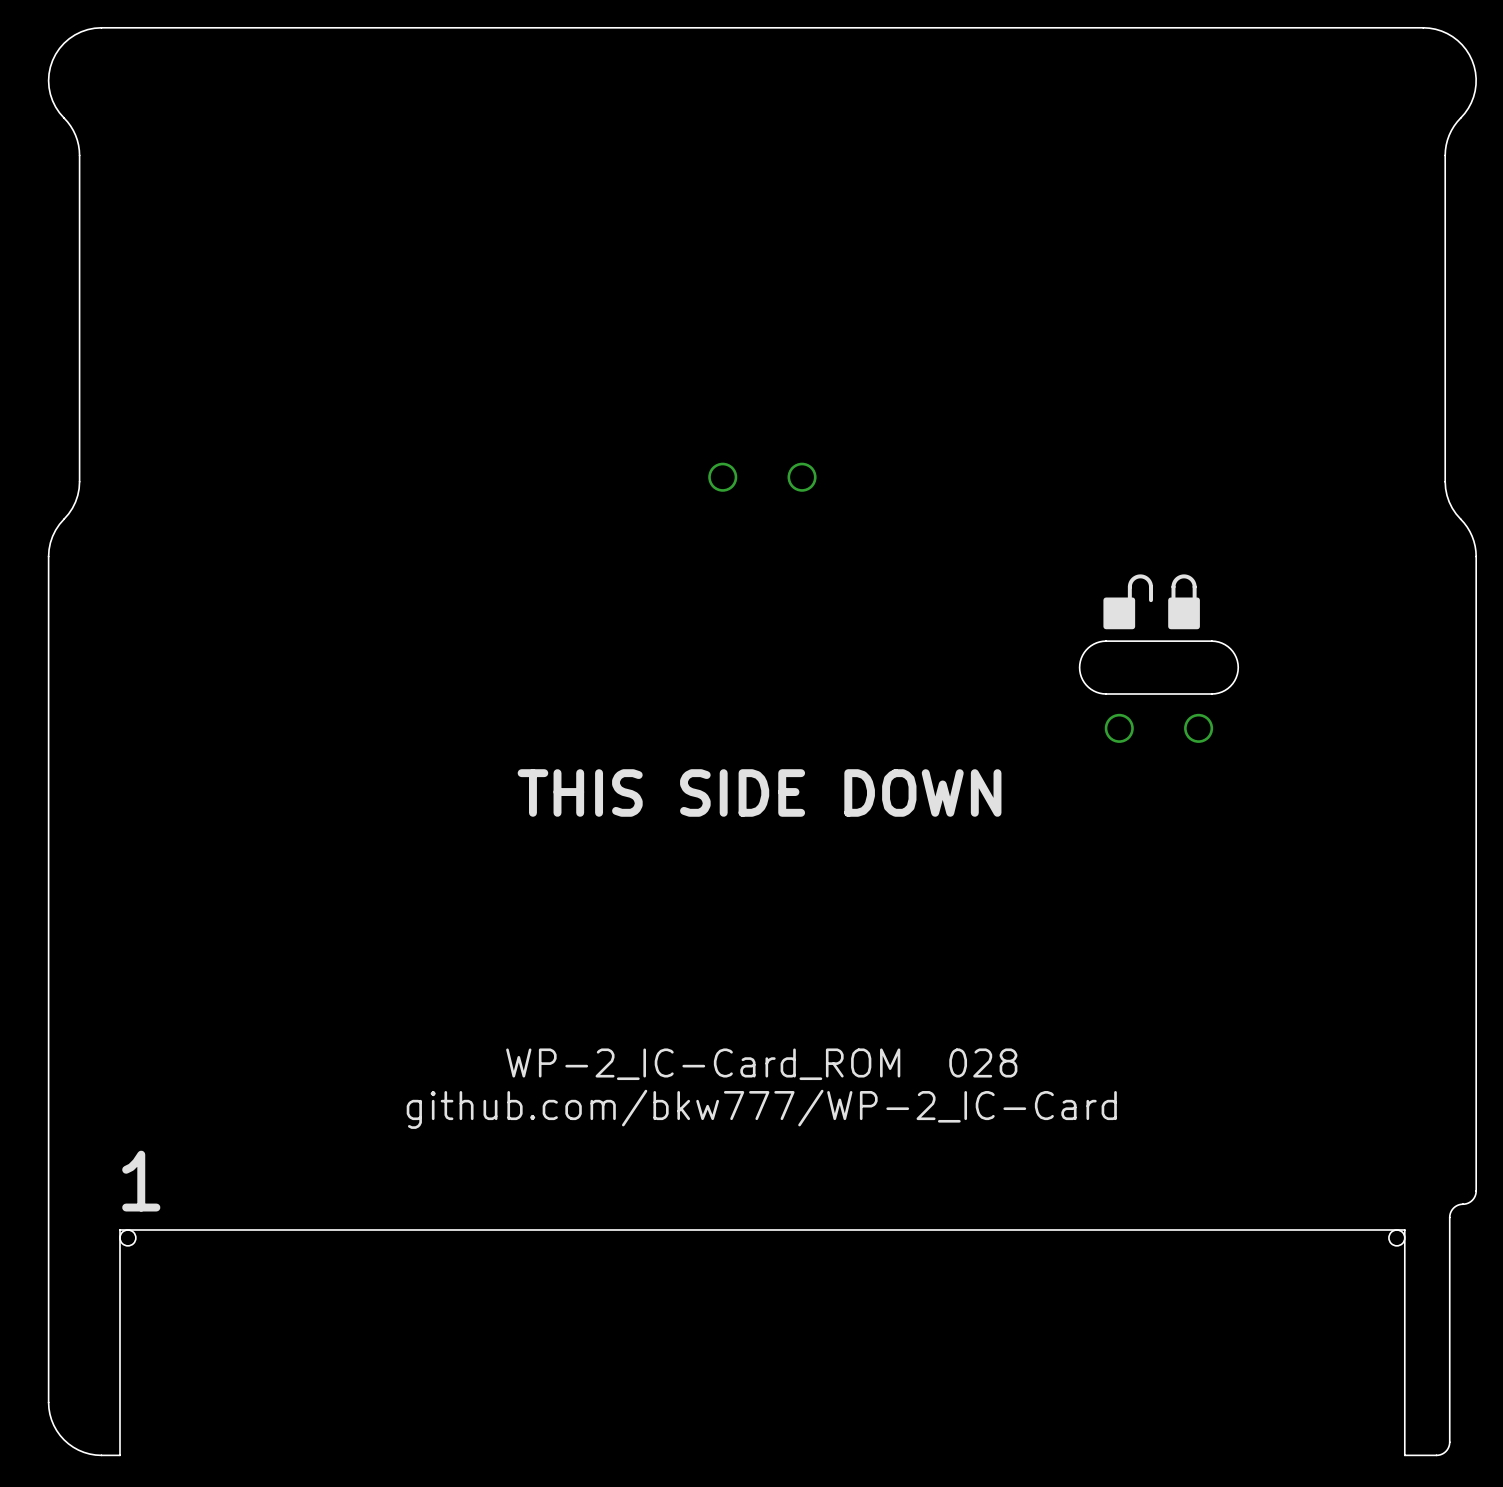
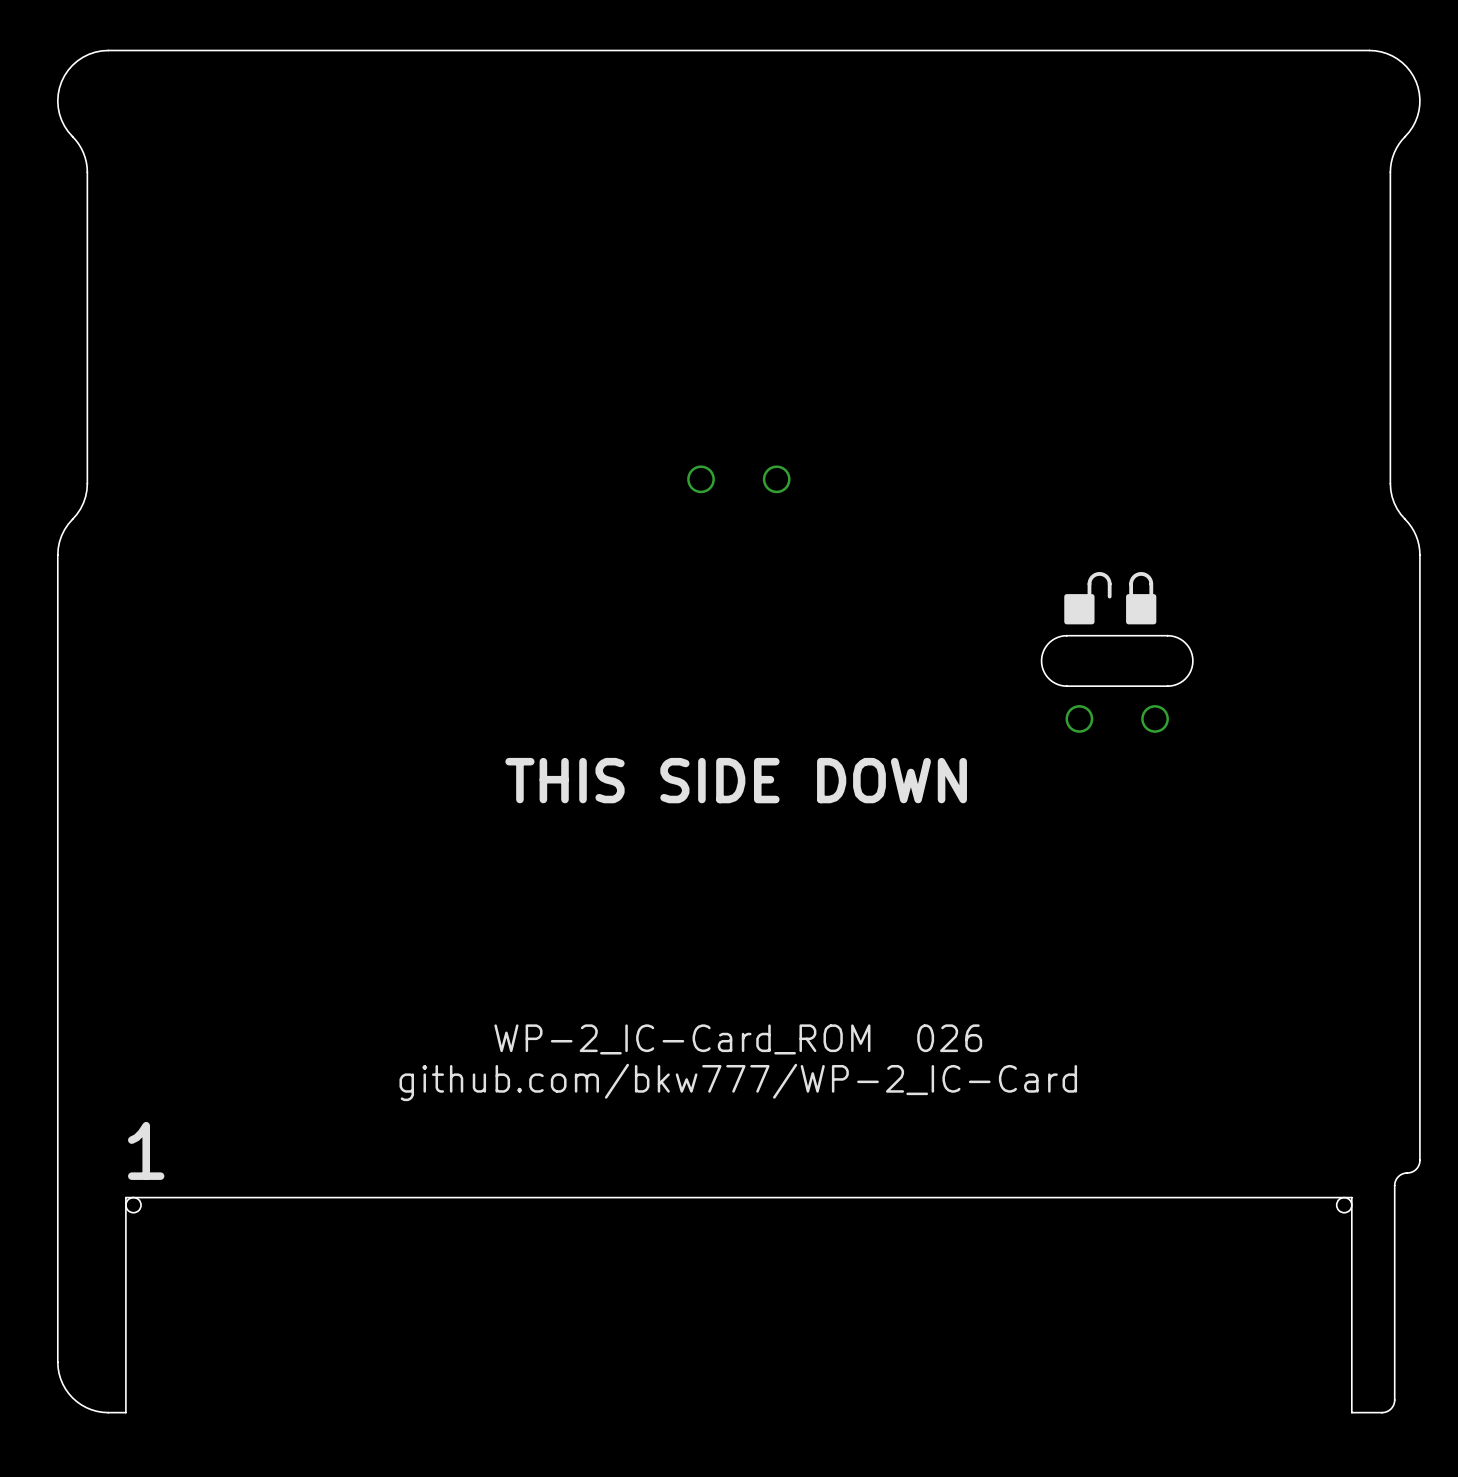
text: WP-2_IC-Card_ROM 028 (761, 1064) -> WP-2_IC-Card_ROM 026 (738, 1039)

